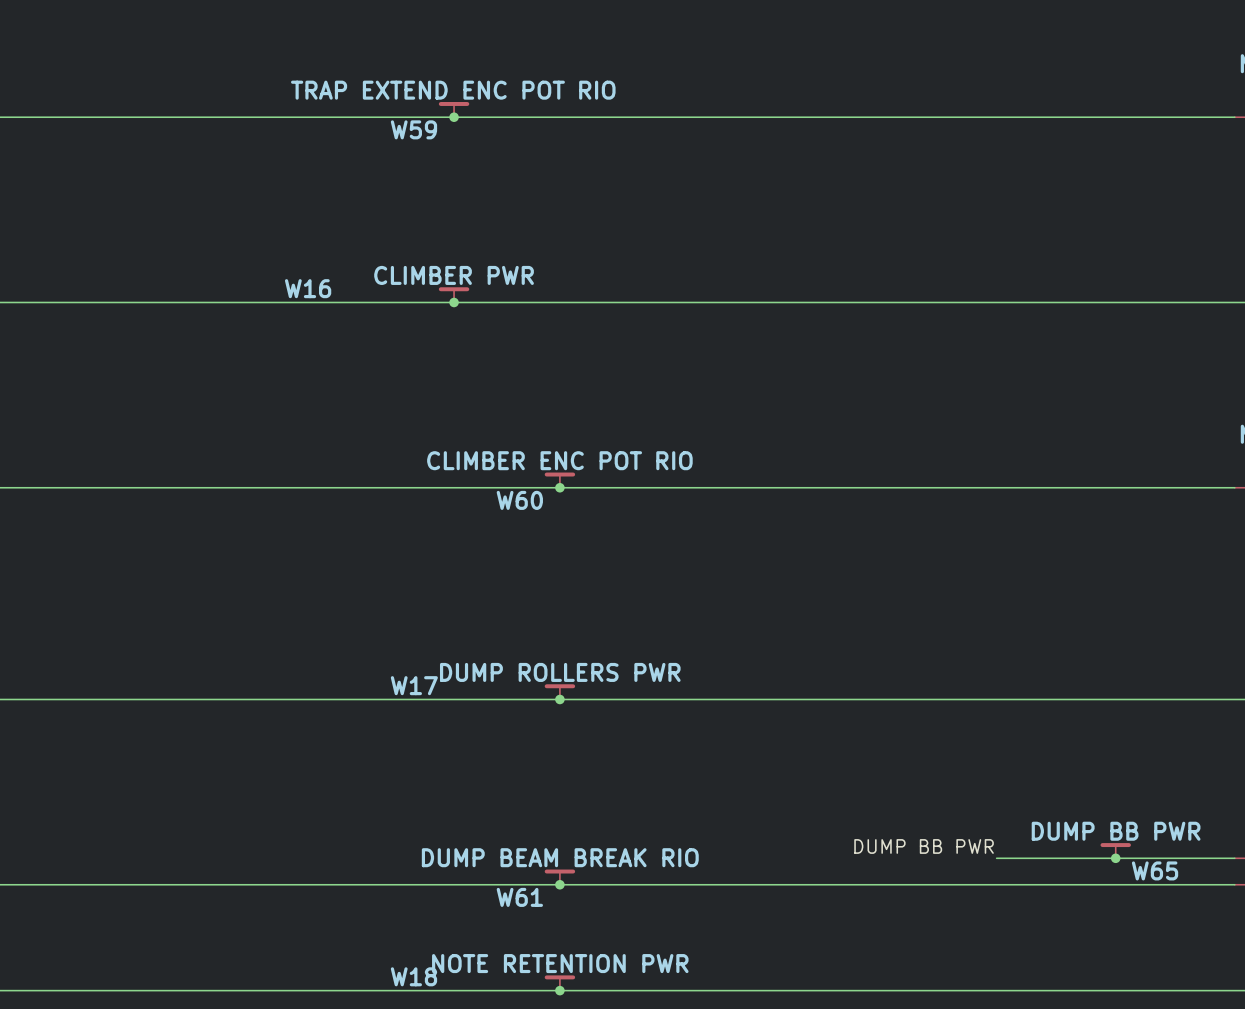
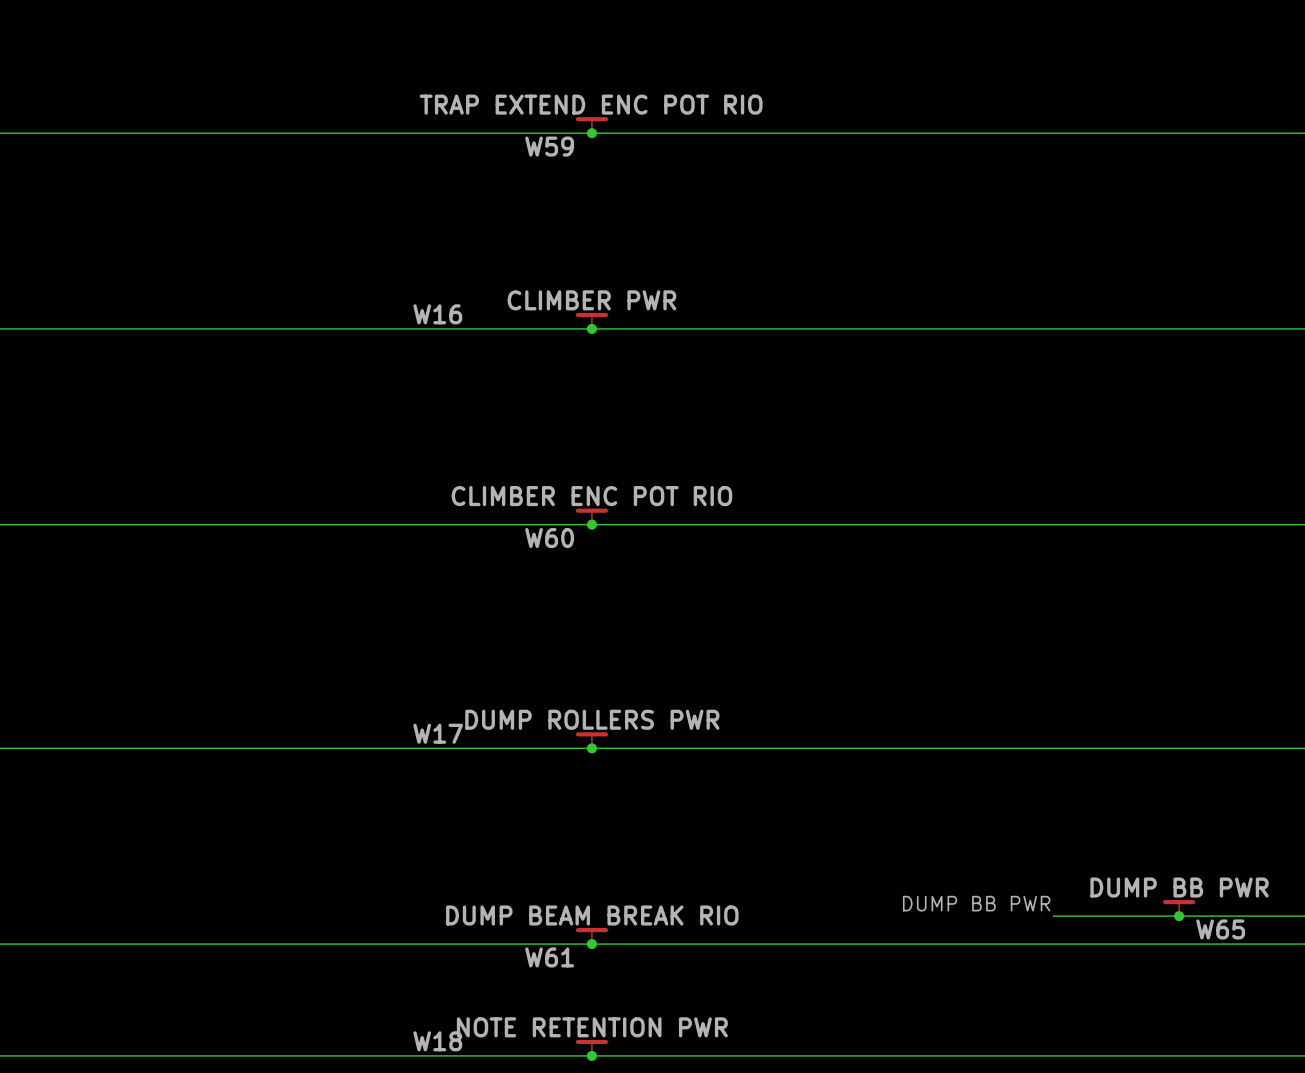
W59 position: (454, 109) -> (591, 125)
junction: (454, 117) -> none
junction: none -> (591, 133)
W16 position: (454, 294) -> (591, 320)
junction: (454, 302) -> none
junction: none -> (591, 328)

